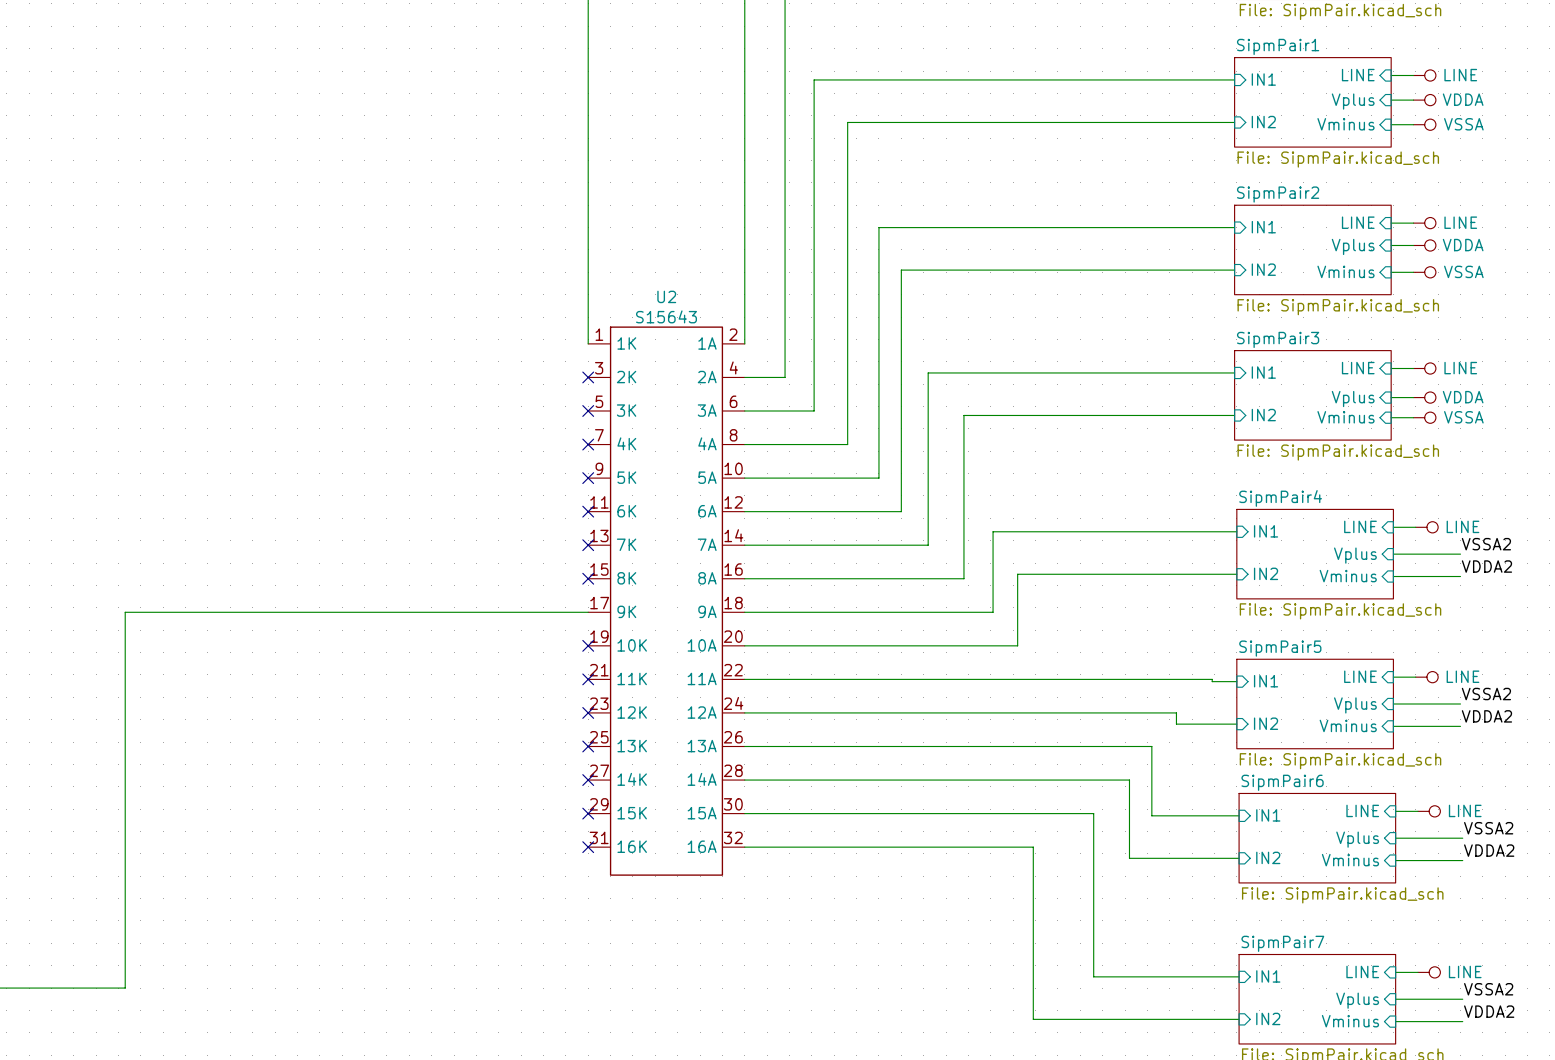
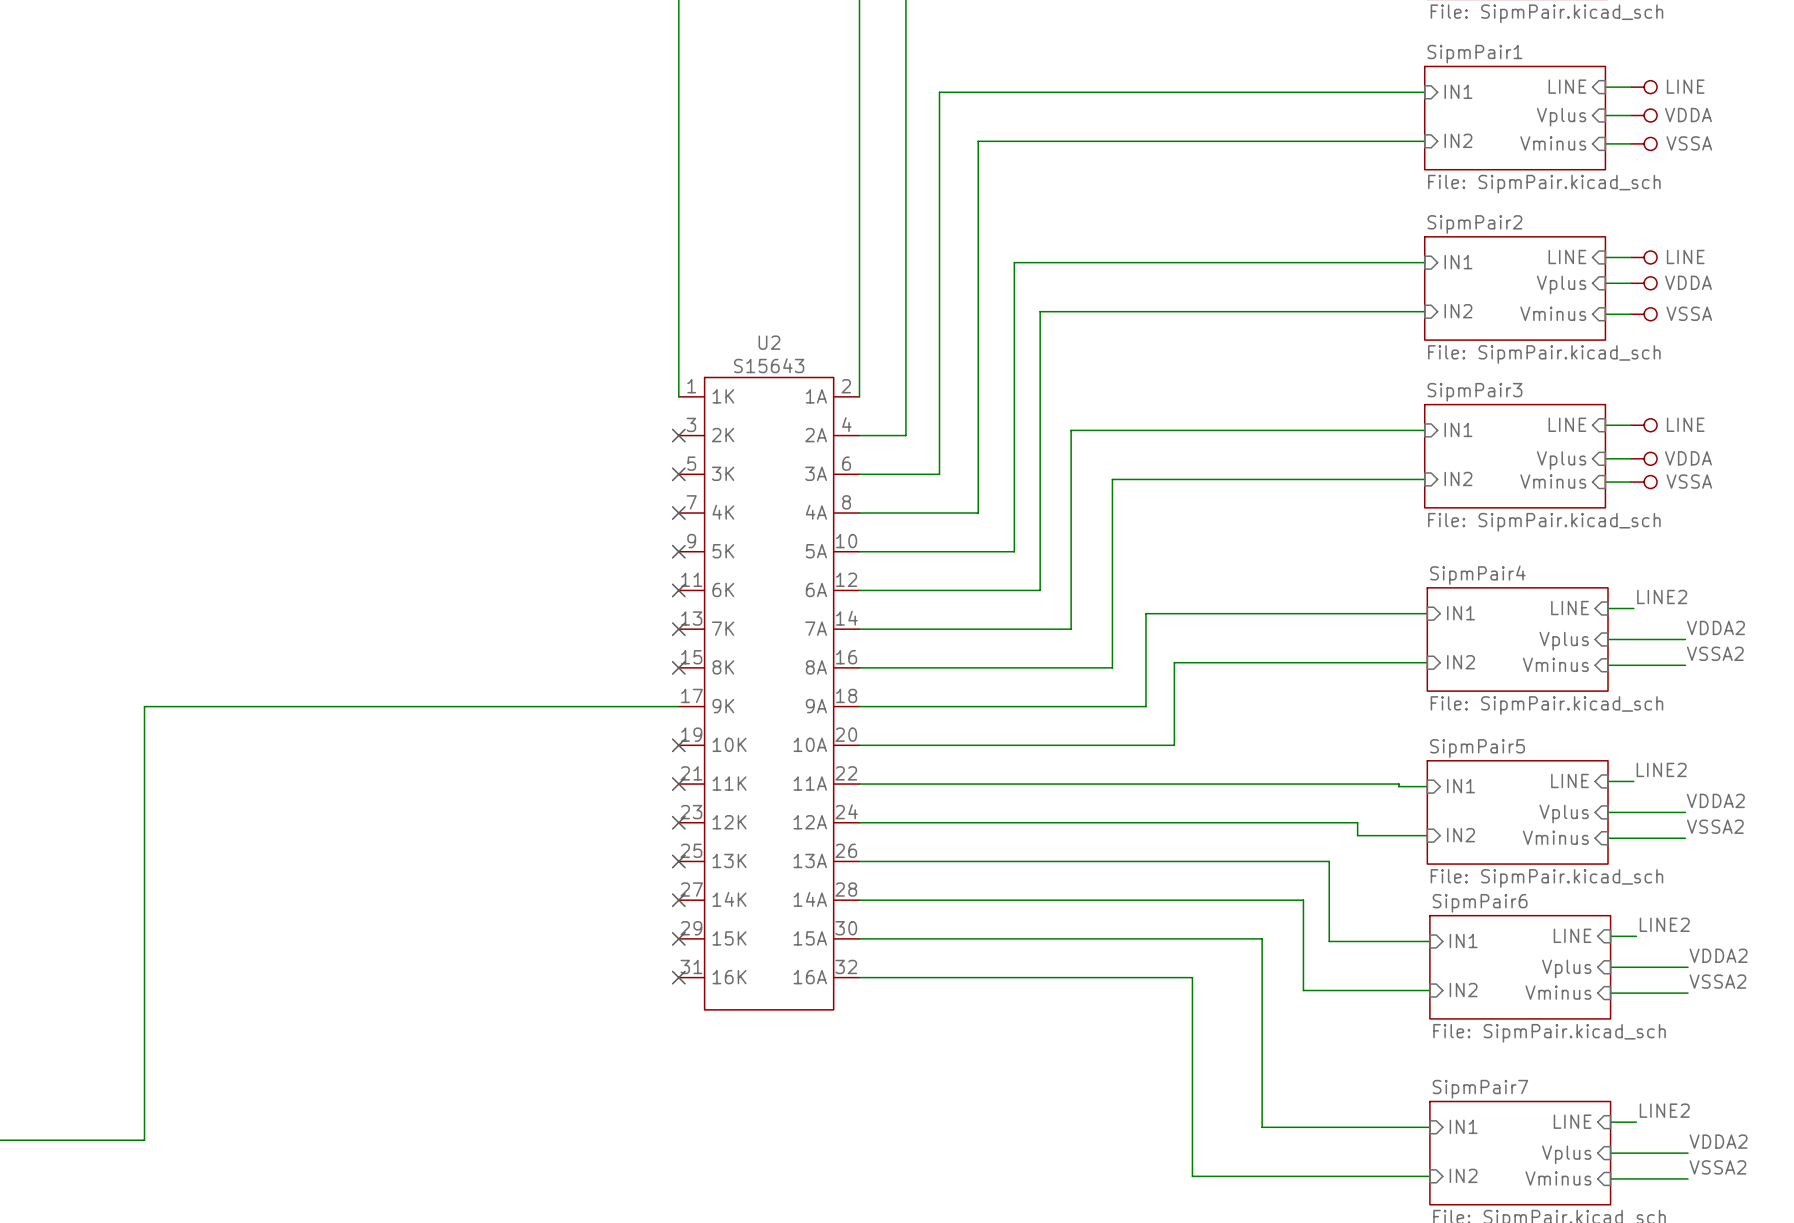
label: none -> LINE2 (1662, 596)
power symbol: LINE (1426, 527) -> none
label: VSSA2 (1486, 544) -> VDDA2 (1715, 627)
label: VDDA2 (1486, 566) -> VSSA2 (1715, 653)
label: none -> LINE2 (1661, 769)
power symbol: LINE (1426, 677) -> none
label: VSSA2 (1486, 694) -> VDDA2 (1715, 800)
label: VDDA2 (1486, 716) -> VSSA2 (1715, 826)
label: none -> LINE2 (1664, 924)
power symbol: LINE (1429, 811) -> none
label: VSSA2 (1488, 828) -> VDDA2 (1718, 955)
label: VDDA2 (1489, 850) -> VSSA2 (1717, 981)
label: none -> LINE2 (1664, 1110)
power symbol: LINE (1429, 972) -> none
label: VSSA2 (1488, 989) -> VDDA2 (1718, 1141)
label: VDDA2 (1489, 1011) -> VSSA2 (1717, 1167)

